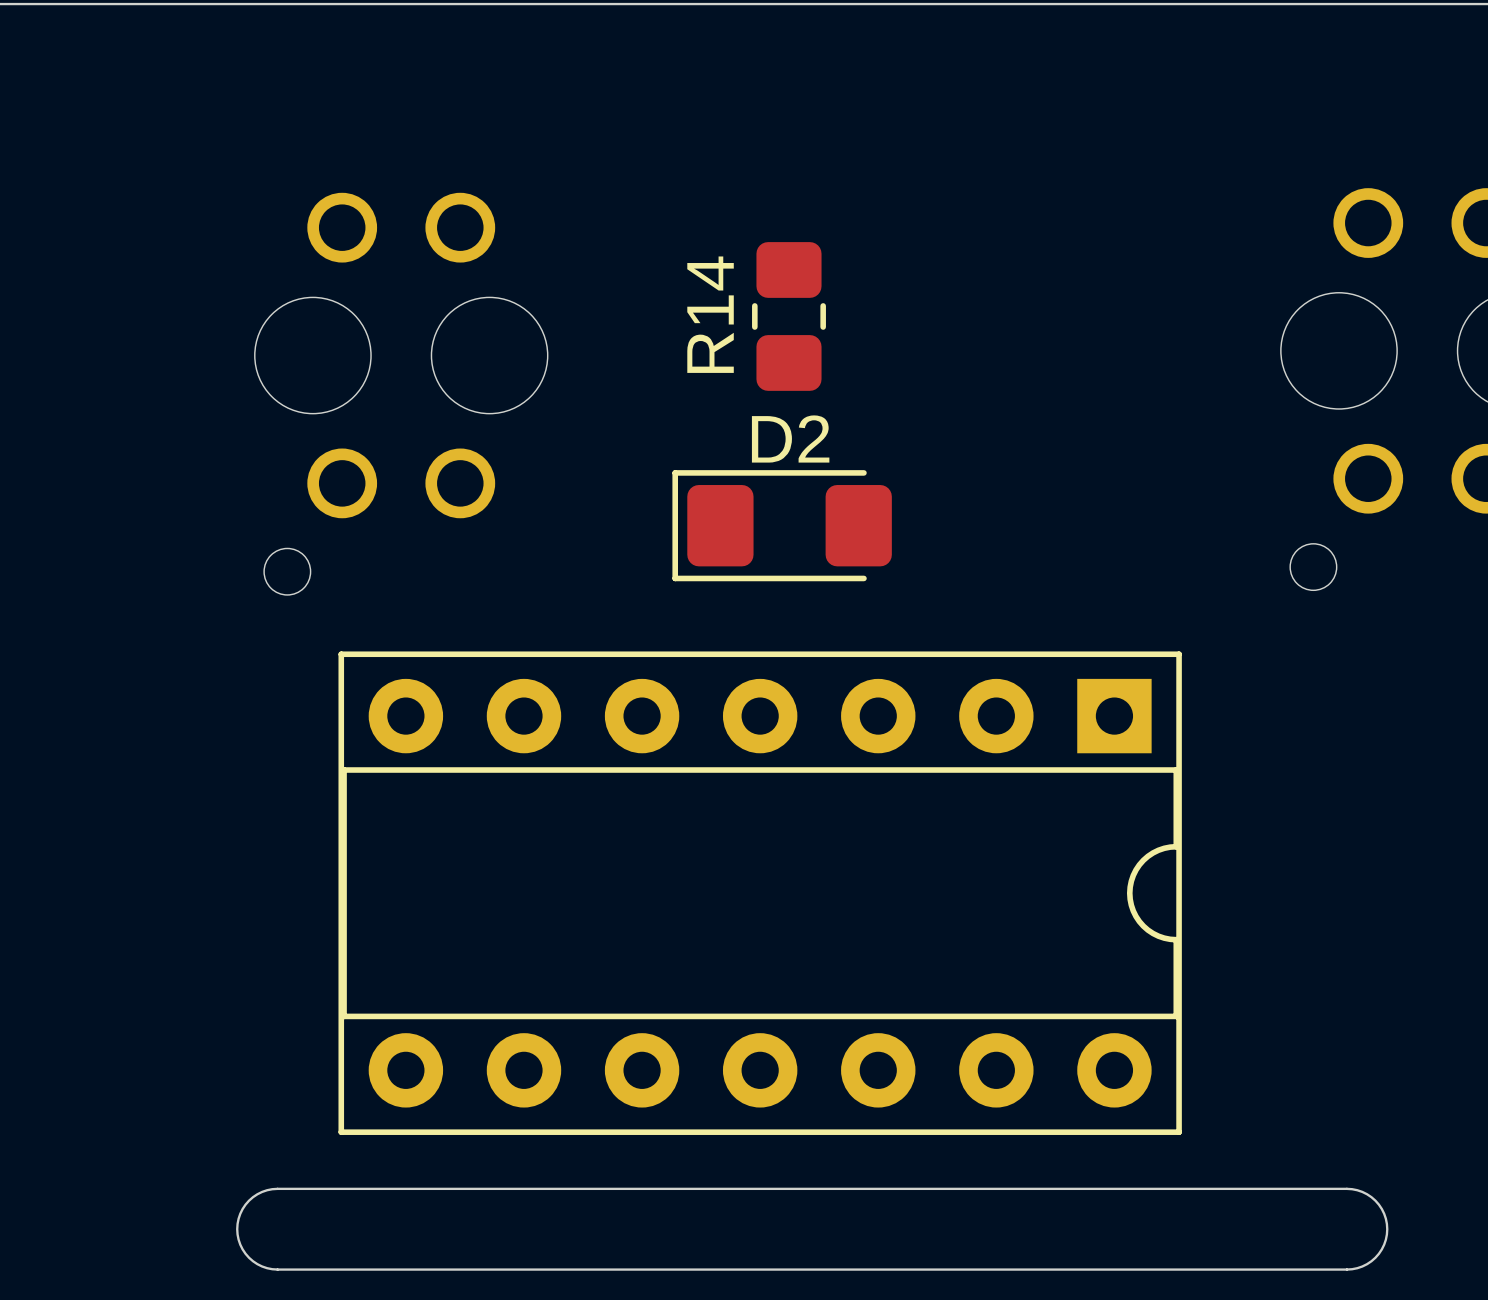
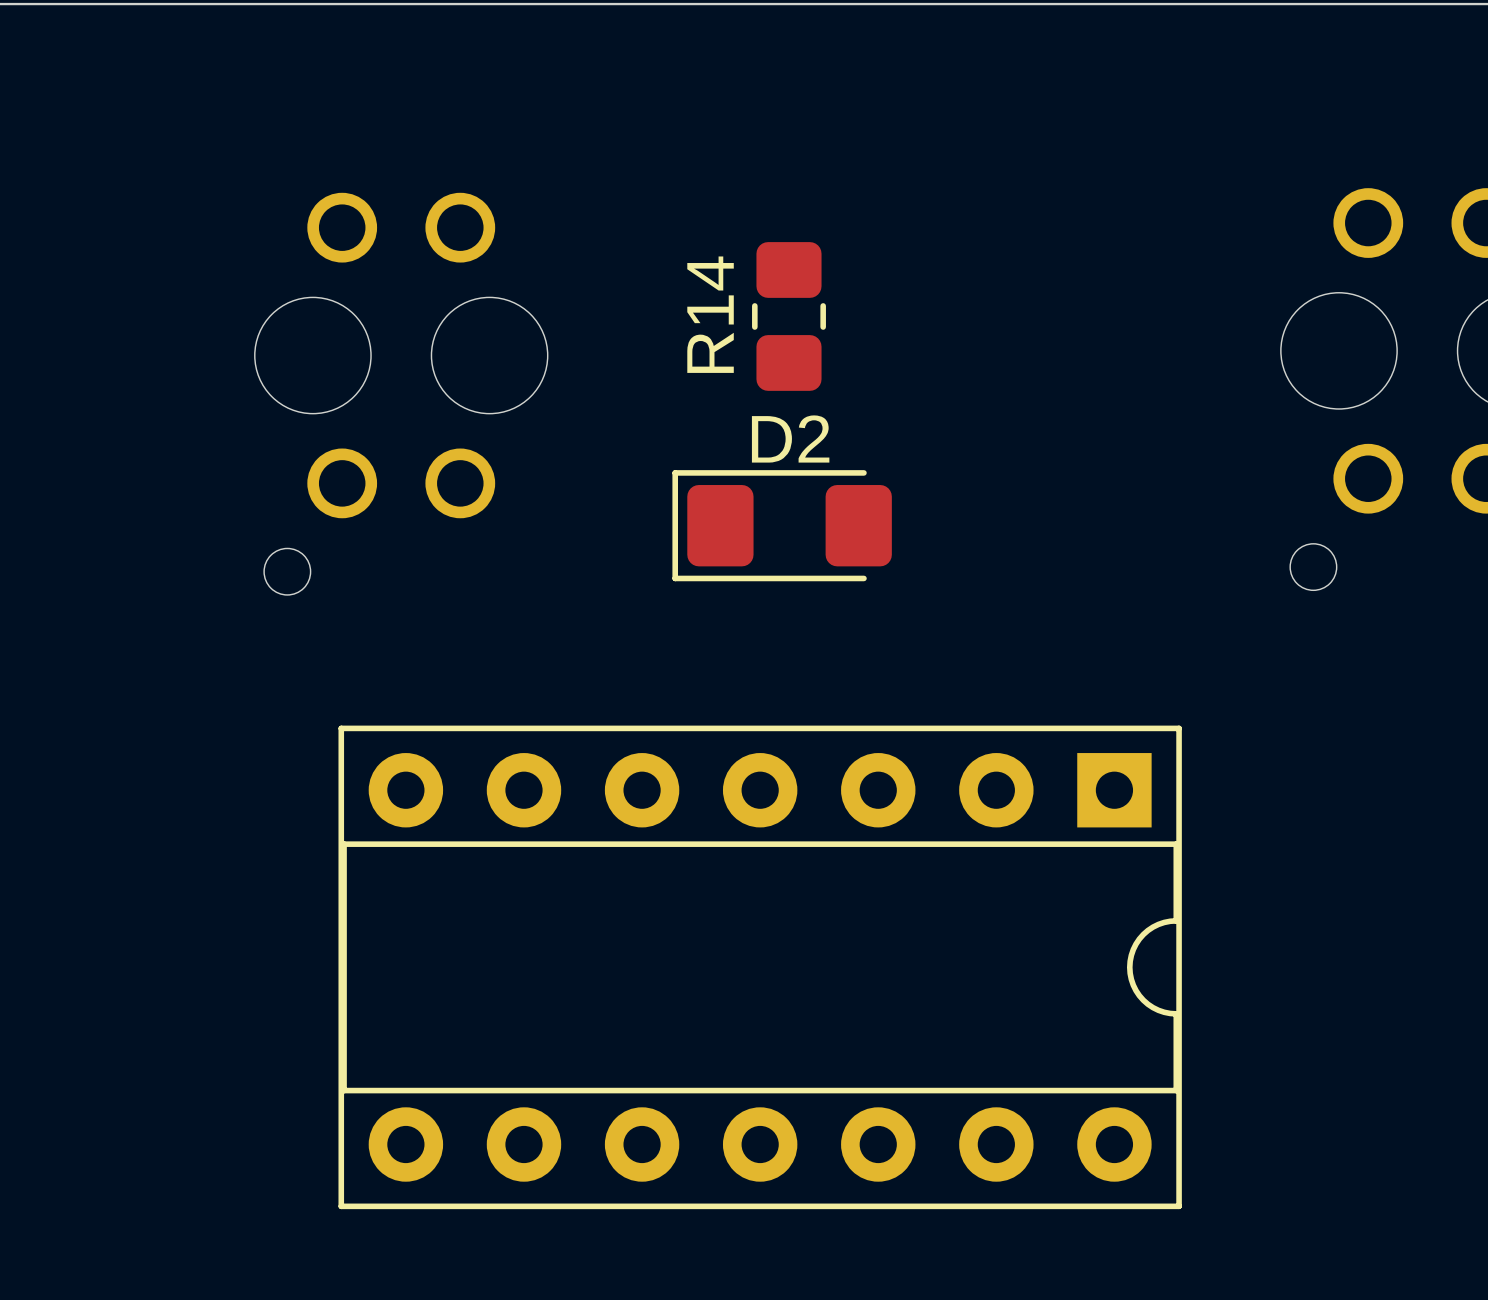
part position: (760, 893) -> (760, 967)
board edge: (277, 1188) (1346, 1188) (1362, 1191) (1375, 1200) (1384, 1213) (1387, 1229) (1384, 1244) (1375, 1257) (1362, 1266) (1346, 1269) (277, 1269) (262, 1266) (249, 1257) (240, 1244) (237, 1229) (240, 1213) (249, 1200) (262, 1191) (277, 1188) -> none

